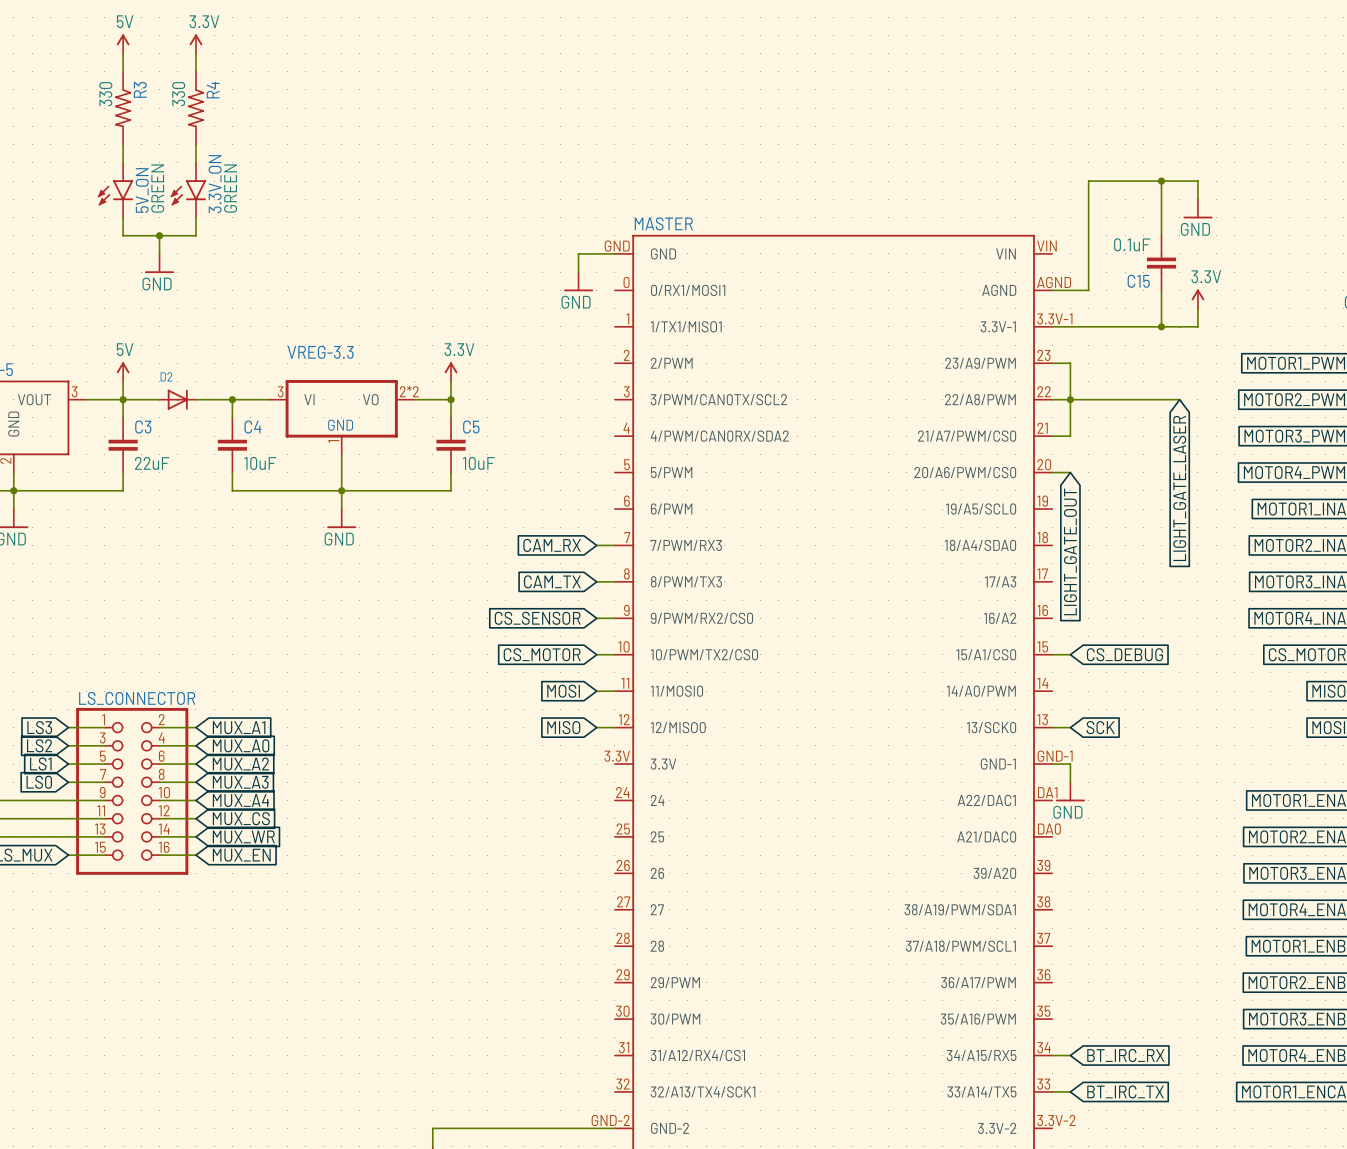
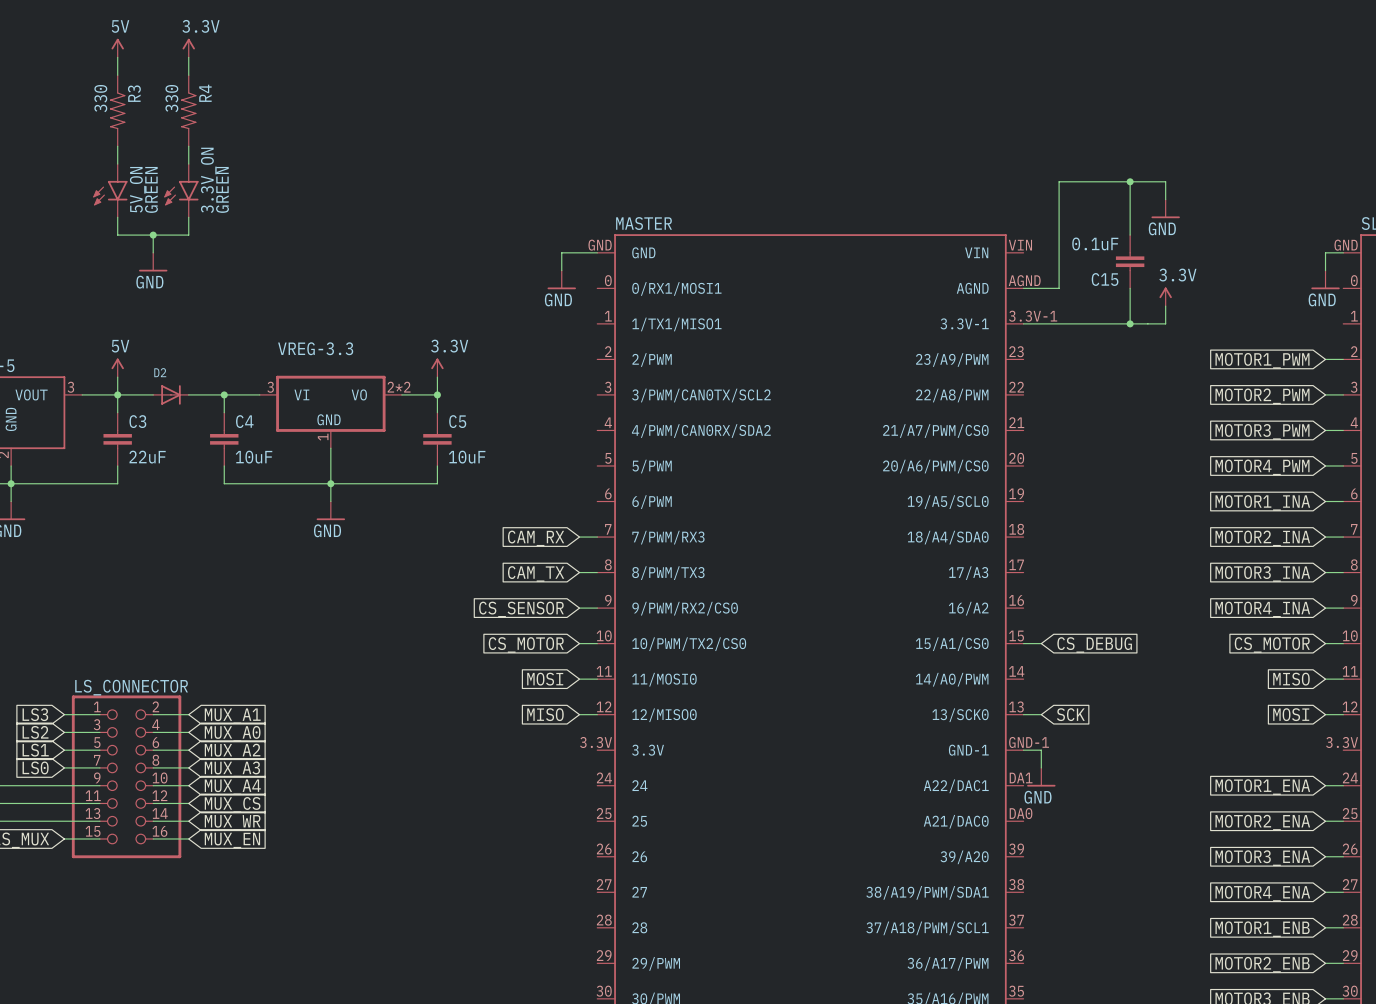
wire: (1052, 363) (1070, 363) (1070, 436) (1052, 436) -> none
wire: (1052, 399) (1179, 399) -> none
junction: (1070, 399) -> none
wire: (1052, 472) (1070, 472) -> none
global label: LIGHT_GATE_LASER (1179, 488) -> none
global label: LIGHT_GATE_OUT (1070, 551) -> none

